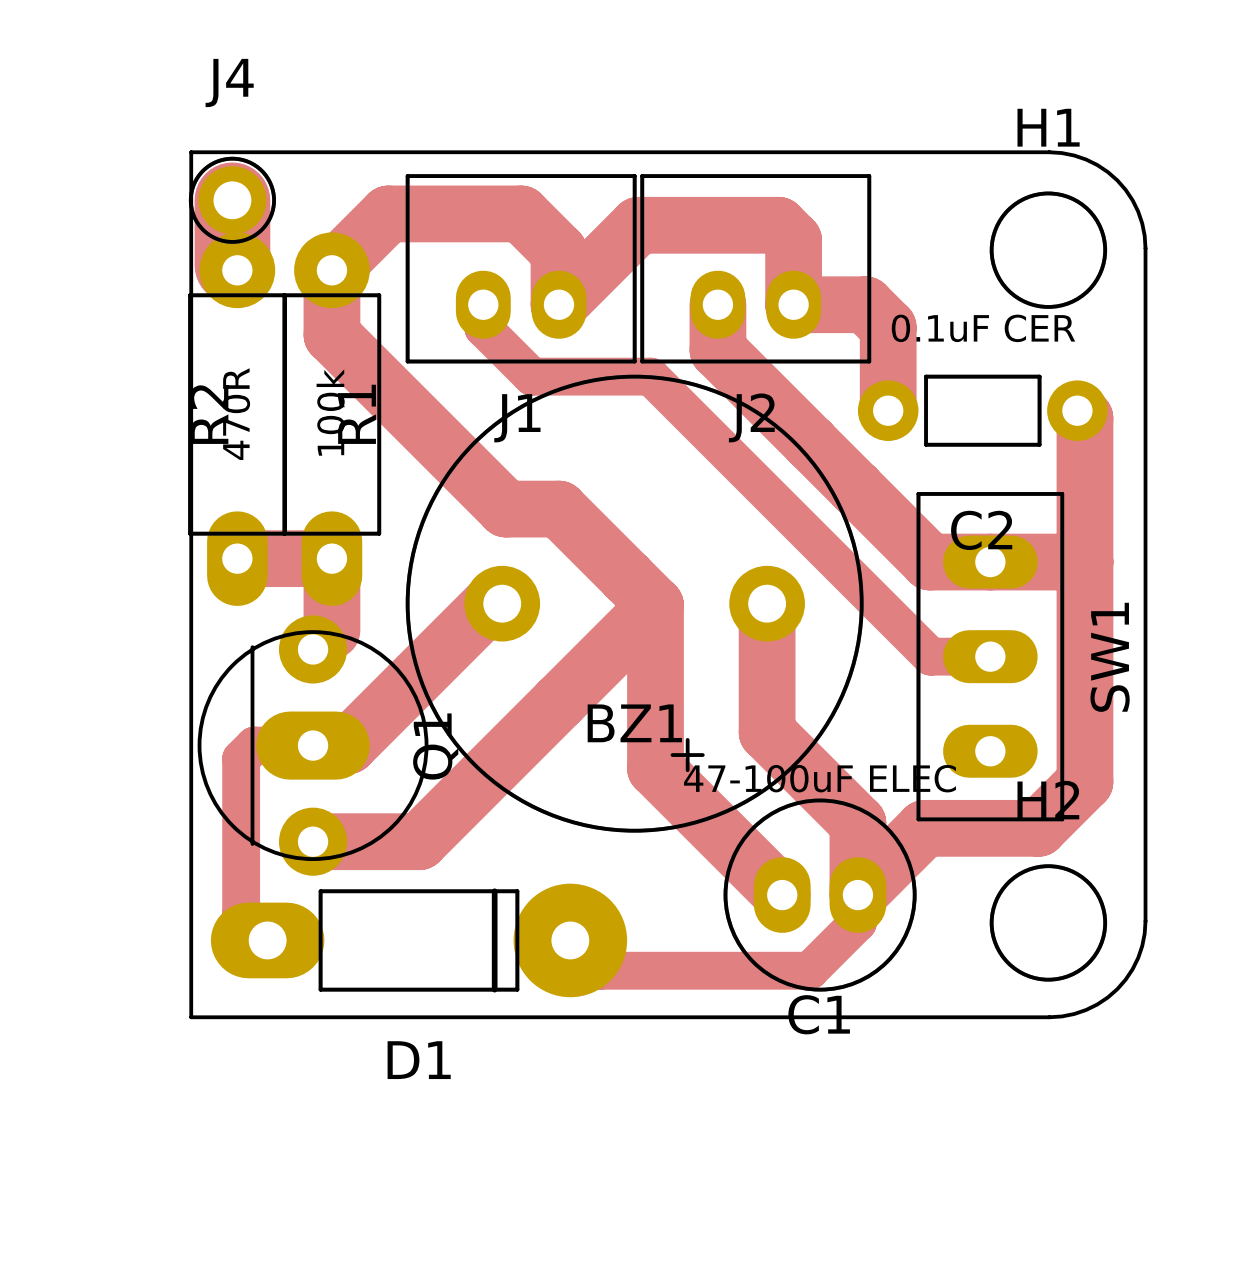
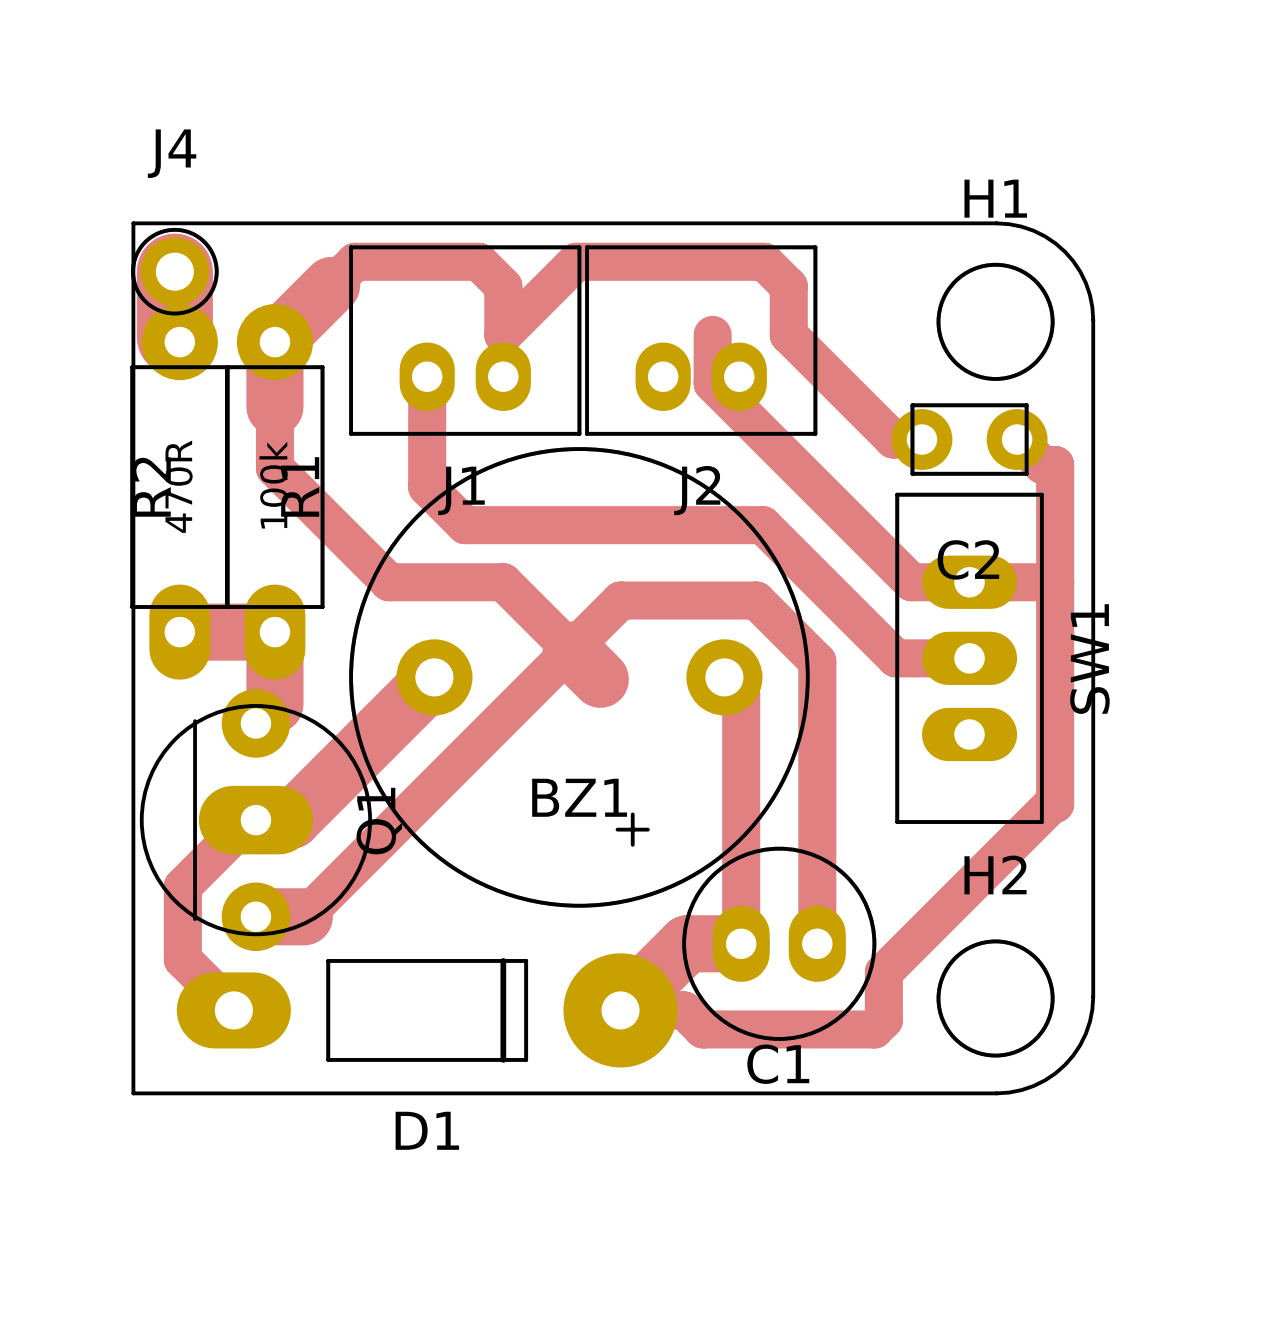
top track: (388, 213) (521, 213) (559, 251) -> (331, 285) (355, 261) (478, 261) (503, 286) (503, 323)
top track: (559, 263) (559, 304) (638, 225) (778, 225) (793, 240) (793, 304) (865, 304) (888, 327) (888, 410) (888, 399) -> (503, 334) (576, 261) (764, 261) (788, 286) (788, 334) (893, 439) (921, 439)
top track: none -> (712, 334) (712, 383) (911, 582) (1055, 582)
top track: (717, 304) (717, 350) (929, 562) (1084, 562) -> none
top track: (483, 328) (531, 376) (650, 376) (930, 656) (990, 656) -> (427, 400) (427, 487) (465, 525) (762, 525) (895, 658) (969, 658)
C2 value: 0.1uF CER (983, 328) -> none
top track: (331, 335) (506, 509) -> (274, 407) (274, 468) (389, 582) (450, 582)
top track: none -> (1017, 439) (1042, 465) (1055, 465) (1055, 803) (1052, 803) (883, 972) (883, 1019) (874, 1029) (703, 1029) (684, 1010) (620, 1010) (687, 943) (741, 943) (741, 694) (724, 677)
BZ1 footprint: [405, 374, 864, 833] -> [349, 447, 810, 908]
C2 footprint: [857, 374, 1108, 447] -> [891, 403, 1048, 476]
top track: (1077, 410) (1084, 418) (1084, 781) (1038, 828) (924, 828) (857, 895) -> none
SW1 footprint: [916, 492, 1065, 822] -> [895, 492, 1044, 824]
top track width: thick (506, 509) (559, 509) (626, 576) -> thin (450, 582) (503, 582) (571, 650)
top track: (767, 603) (767, 732) (857, 823) (857, 895) -> none
top track: (306, 745) (254, 745) (241, 758) (241, 913) (267, 940) -> (249, 820) (182, 886) (182, 959) (233, 1010)
C1 value: 47-100uF ELEC (820, 778) -> none
top track: (361, 841) (419, 841) (655, 605) (655, 768) (782, 895) -> (304, 916) (620, 600) (756, 600) (817, 661) (817, 943)
D1 footprint: [210, 883, 628, 998] -> [176, 953, 678, 1068]
C1 position: (820, 895) -> (779, 943)
top track: (857, 895) (857, 922) (809, 970) (600, 970) (570, 940) -> none

